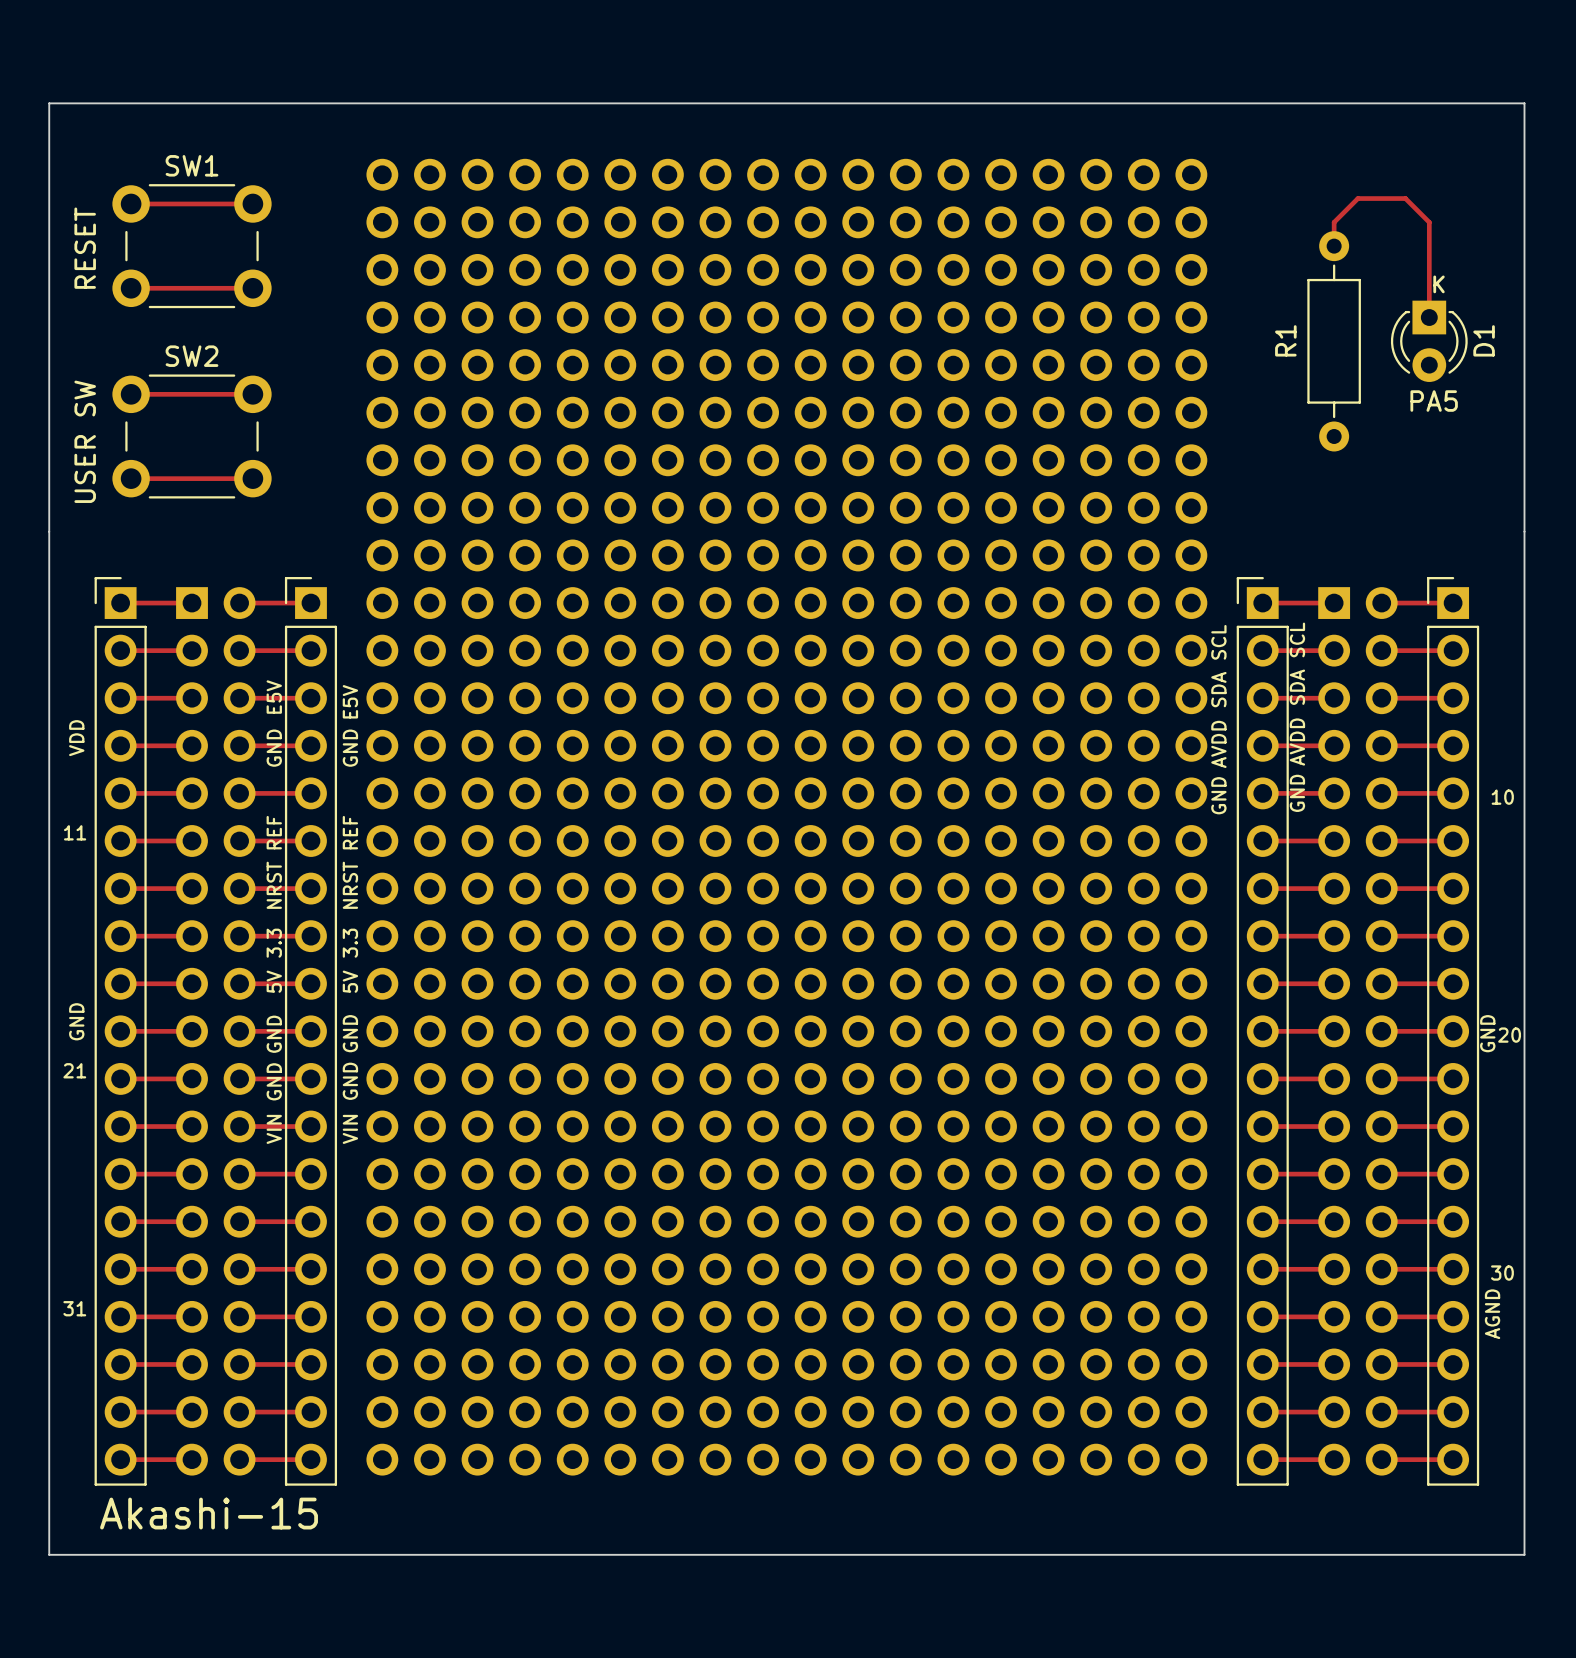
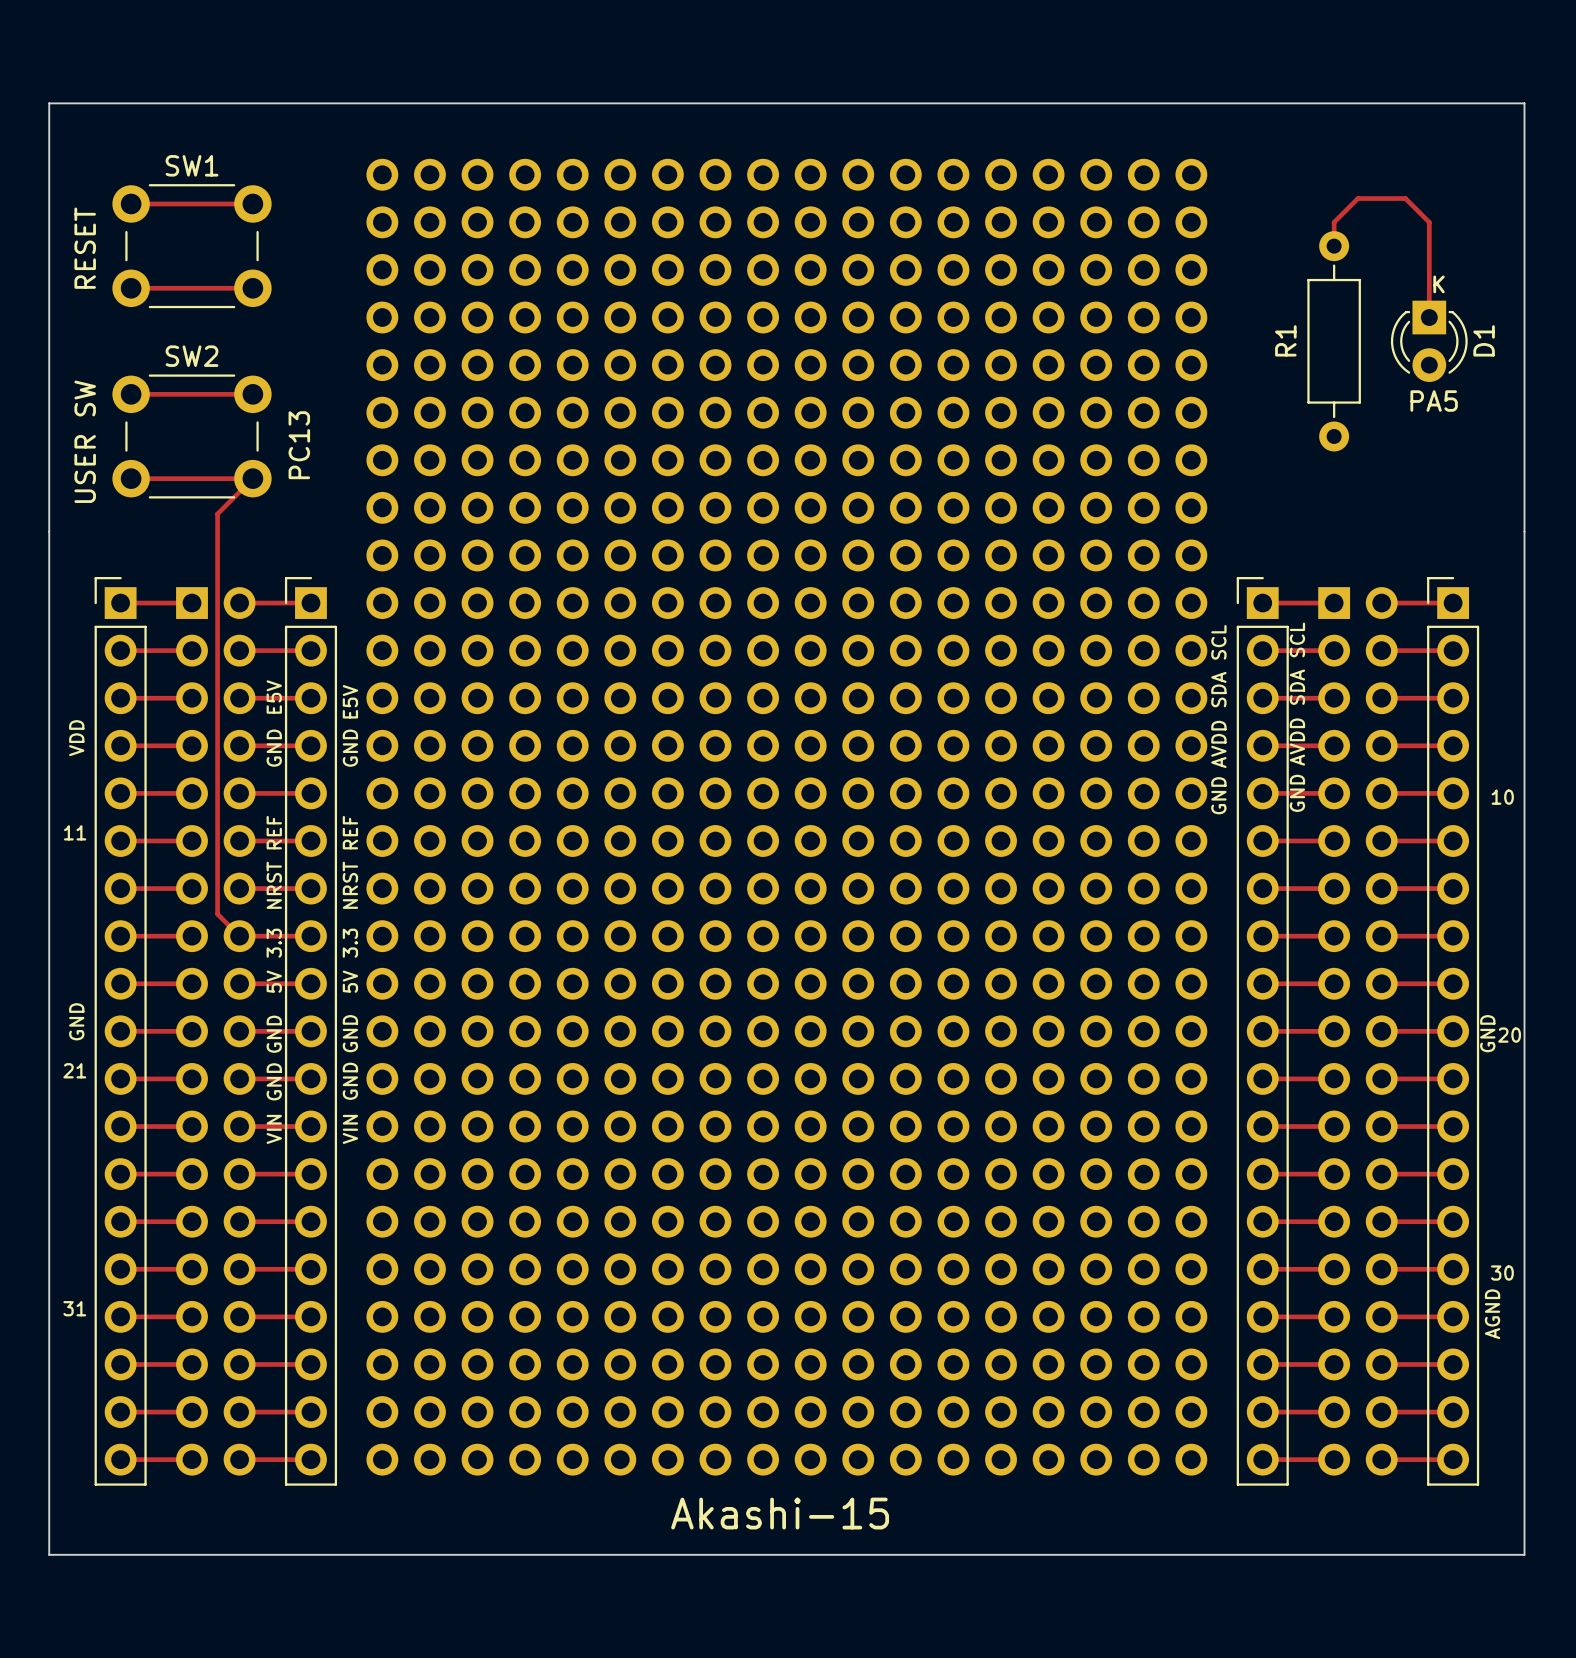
text: none -> PC13 (299, 445)
track: none -> (252, 478) (217, 513) (217, 914) (239, 936)
text: Akashi-15 (209, 1513) -> none
text: none -> Akashi-15 (780, 1513)

